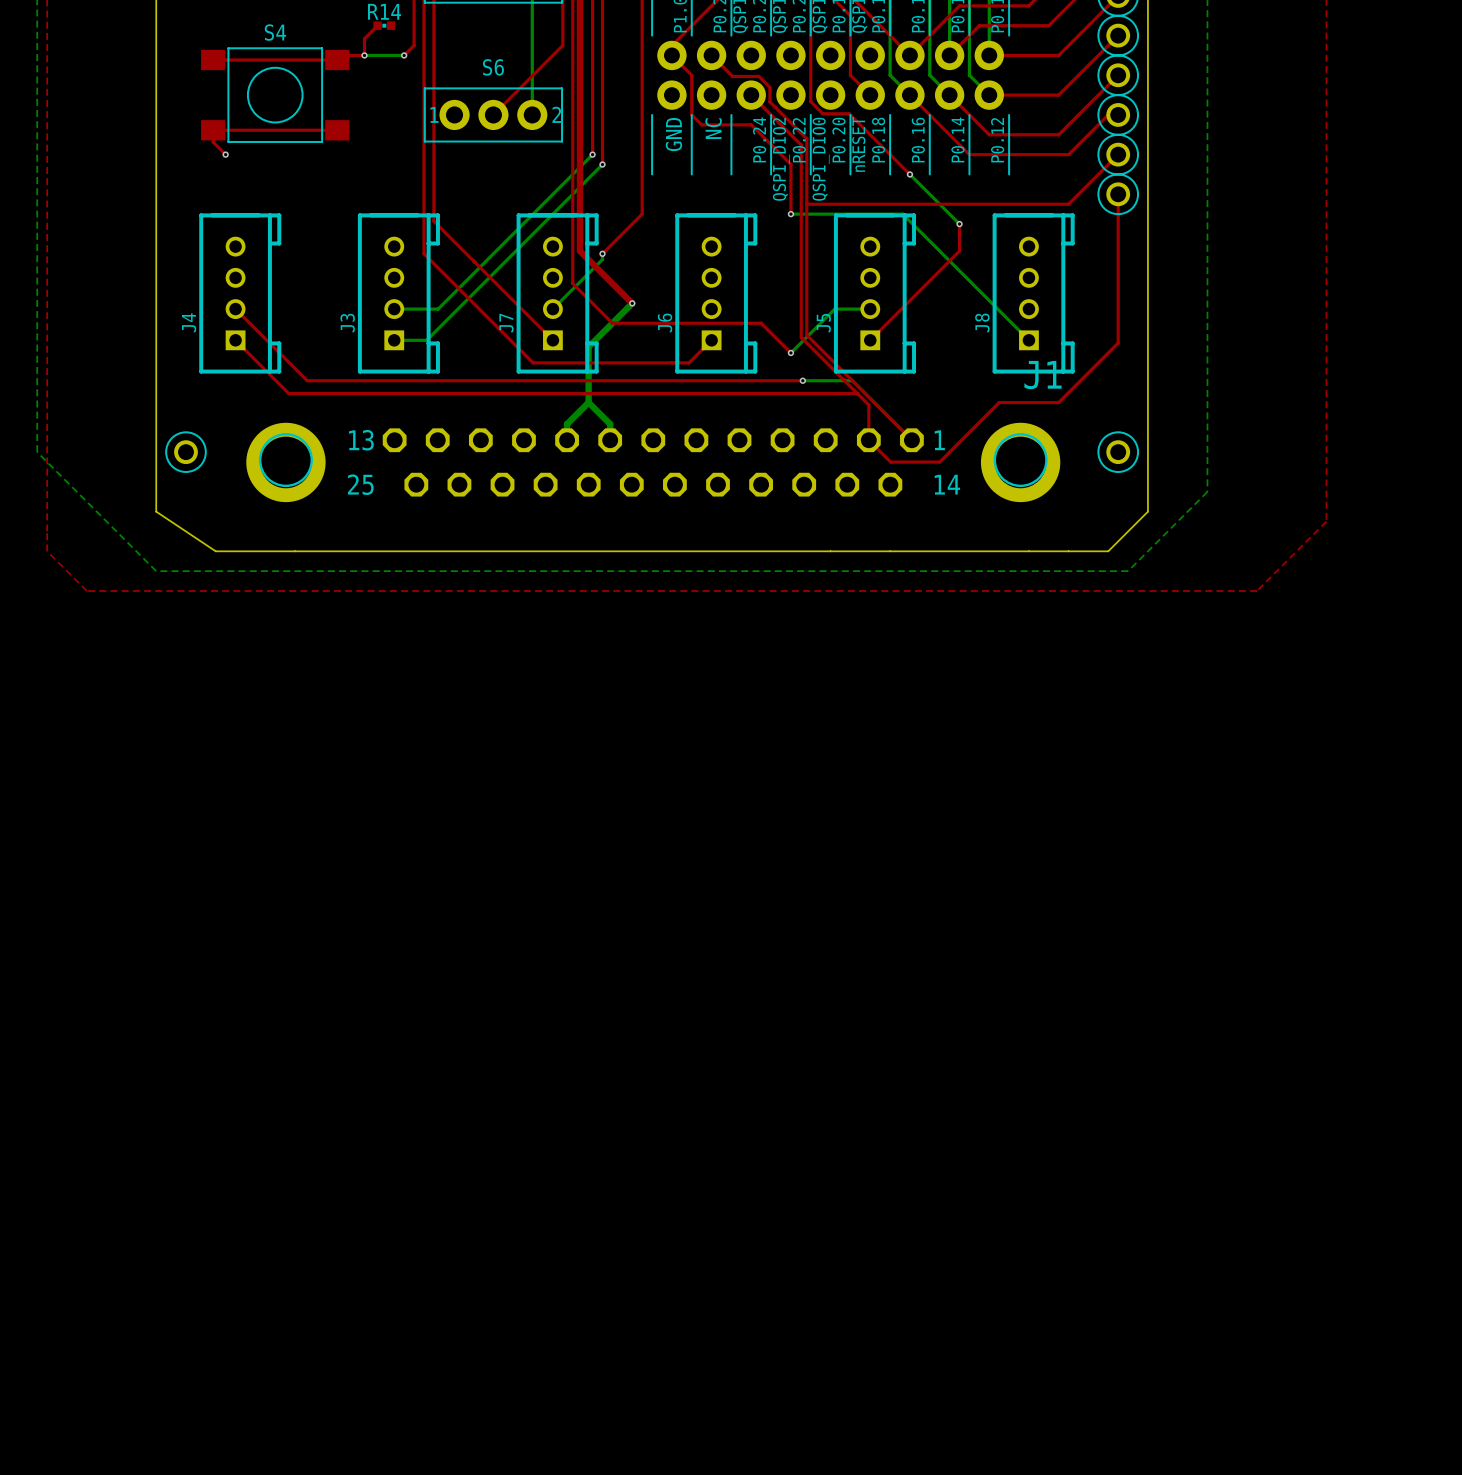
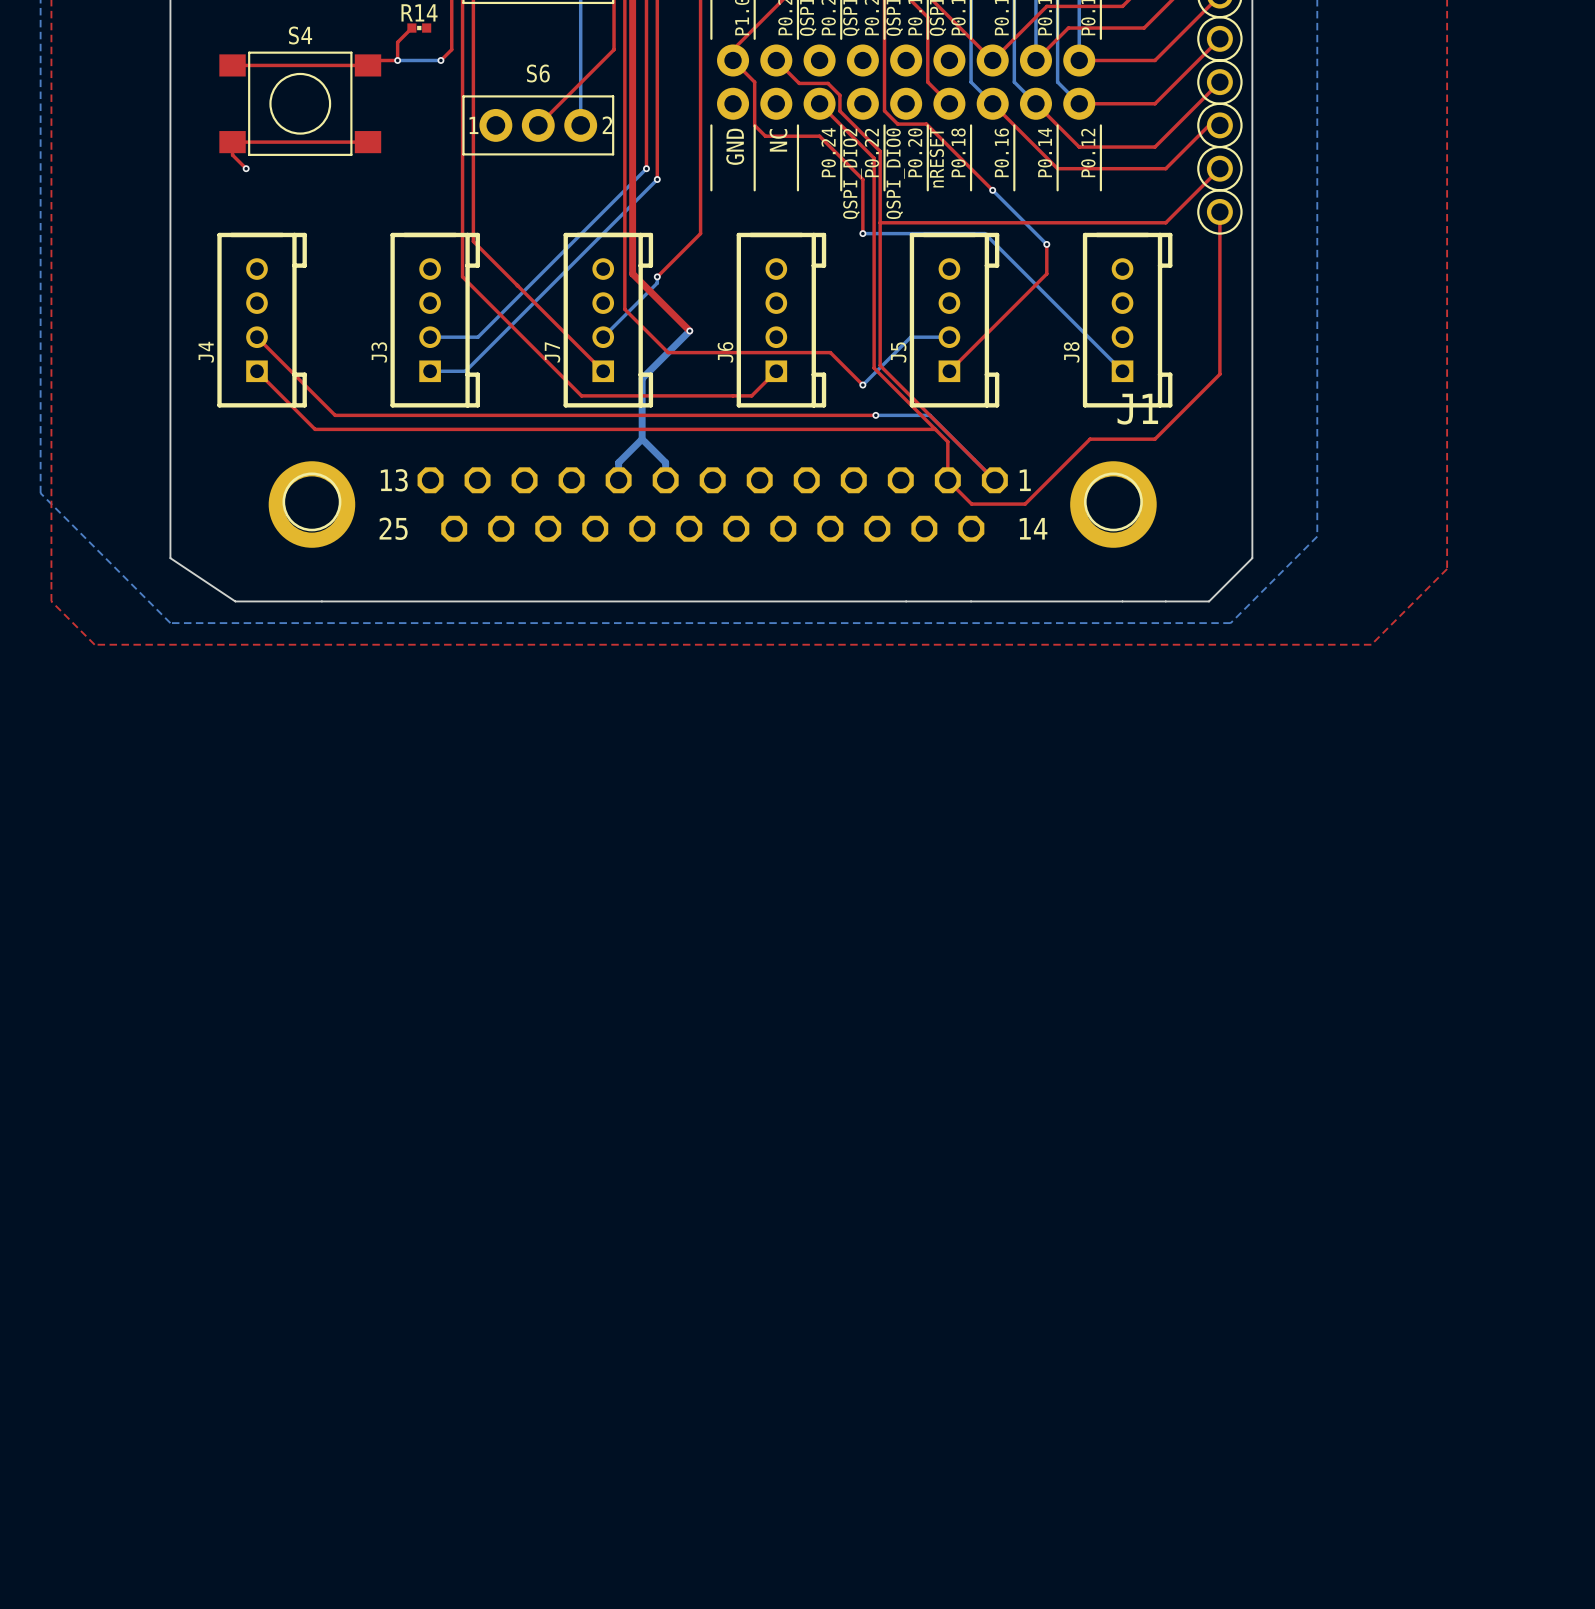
part: (185, 452) -> none
part: (1118, 452) -> none

